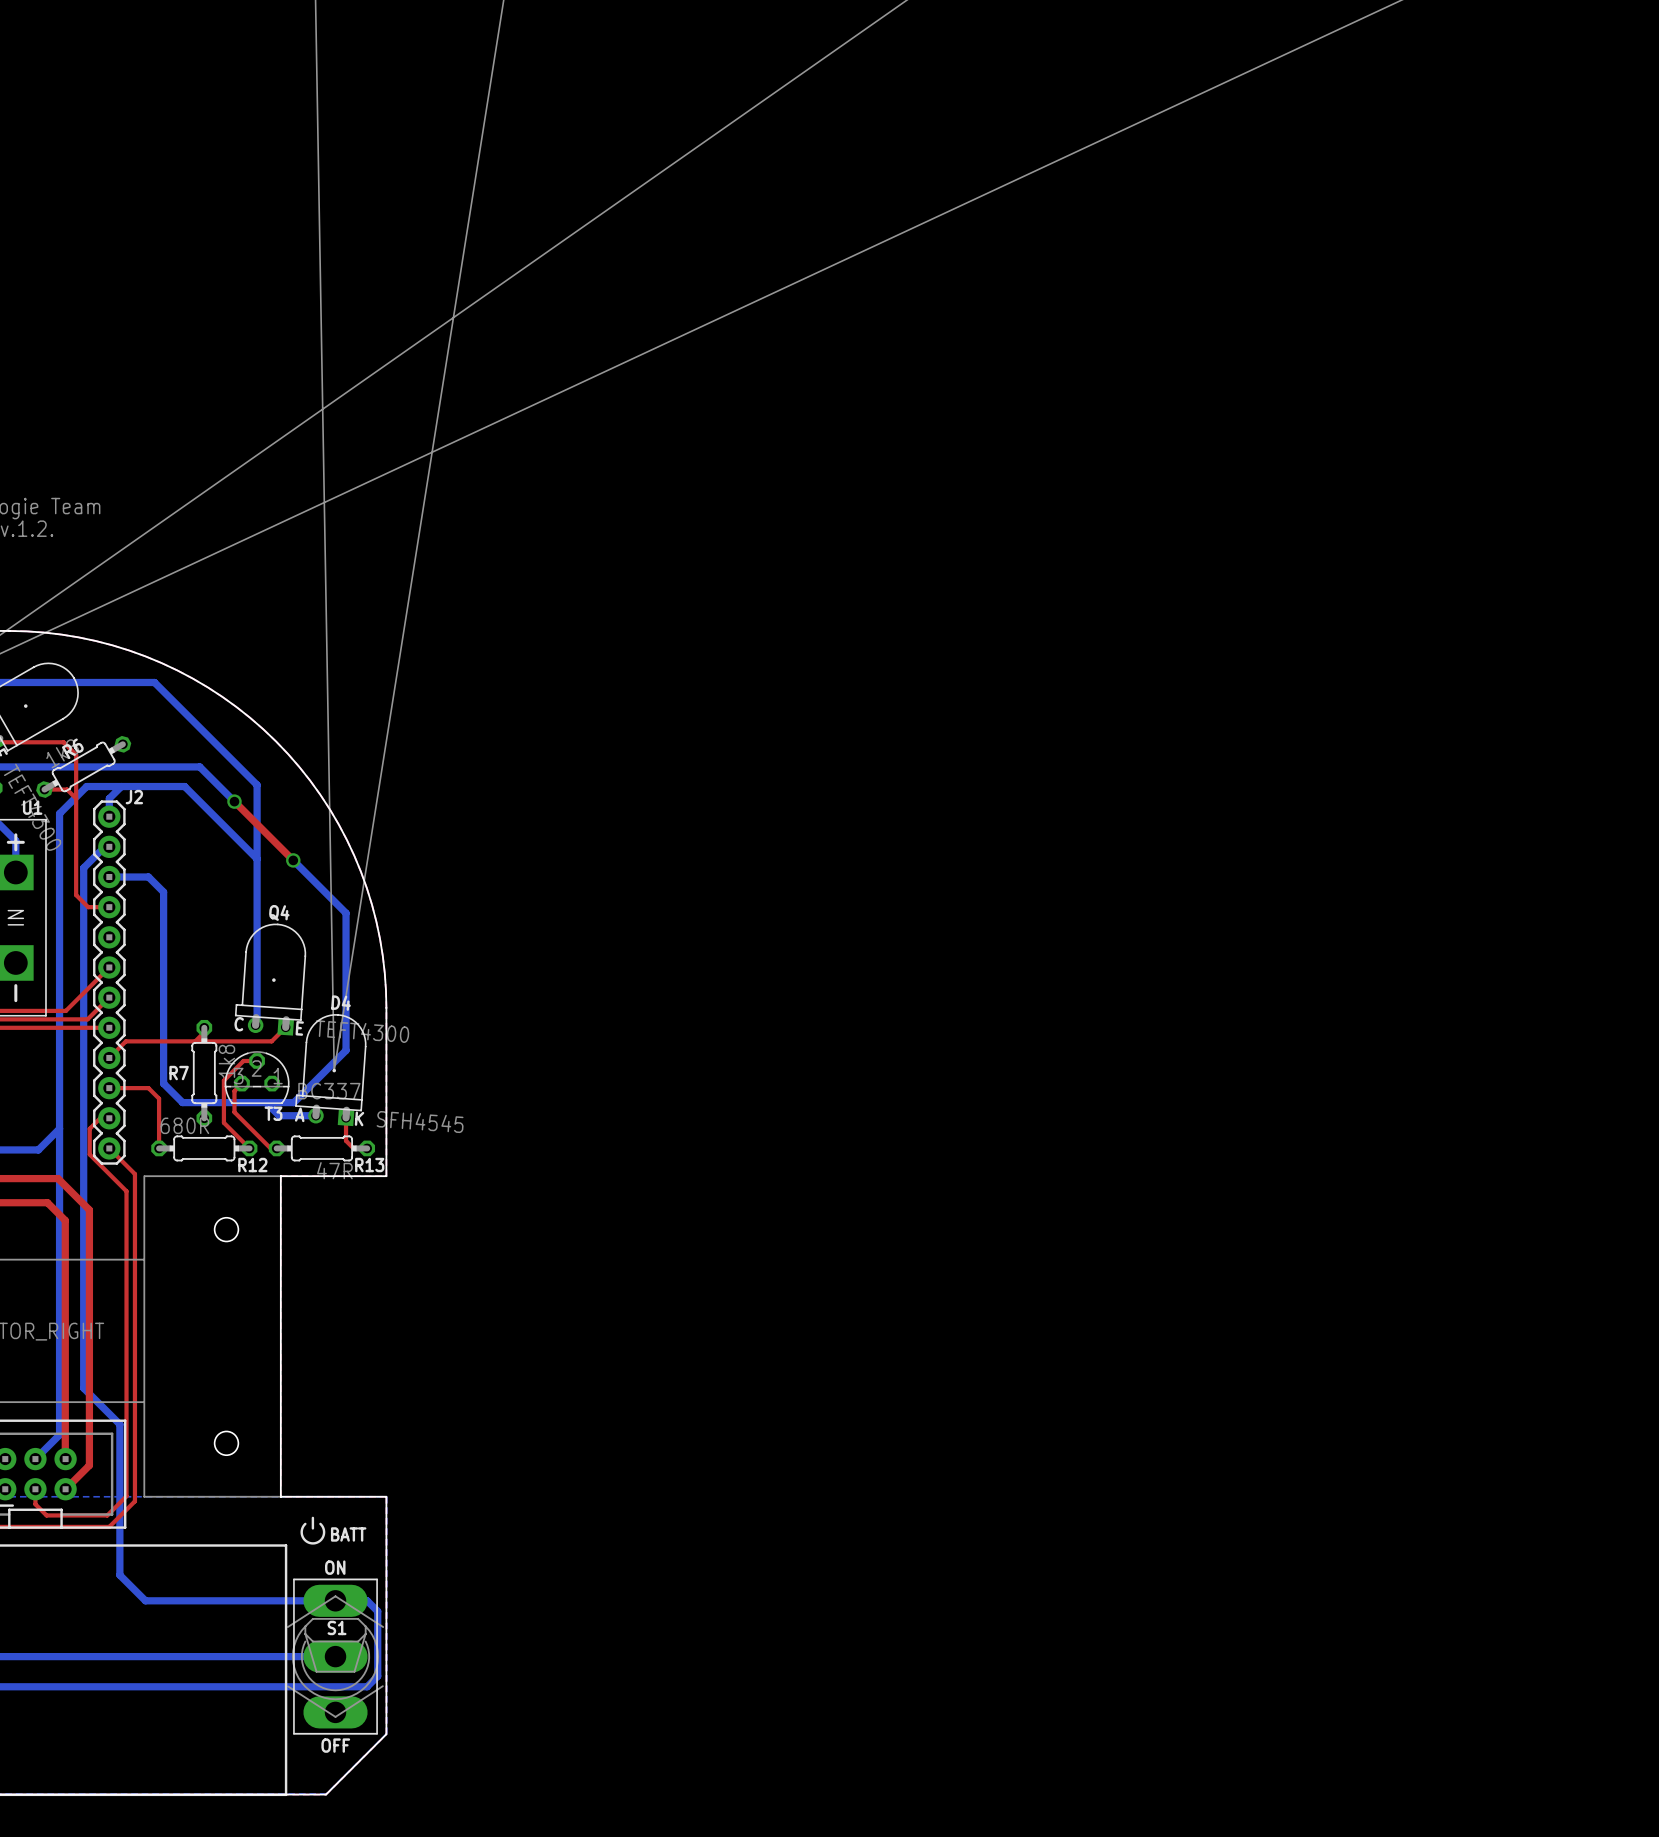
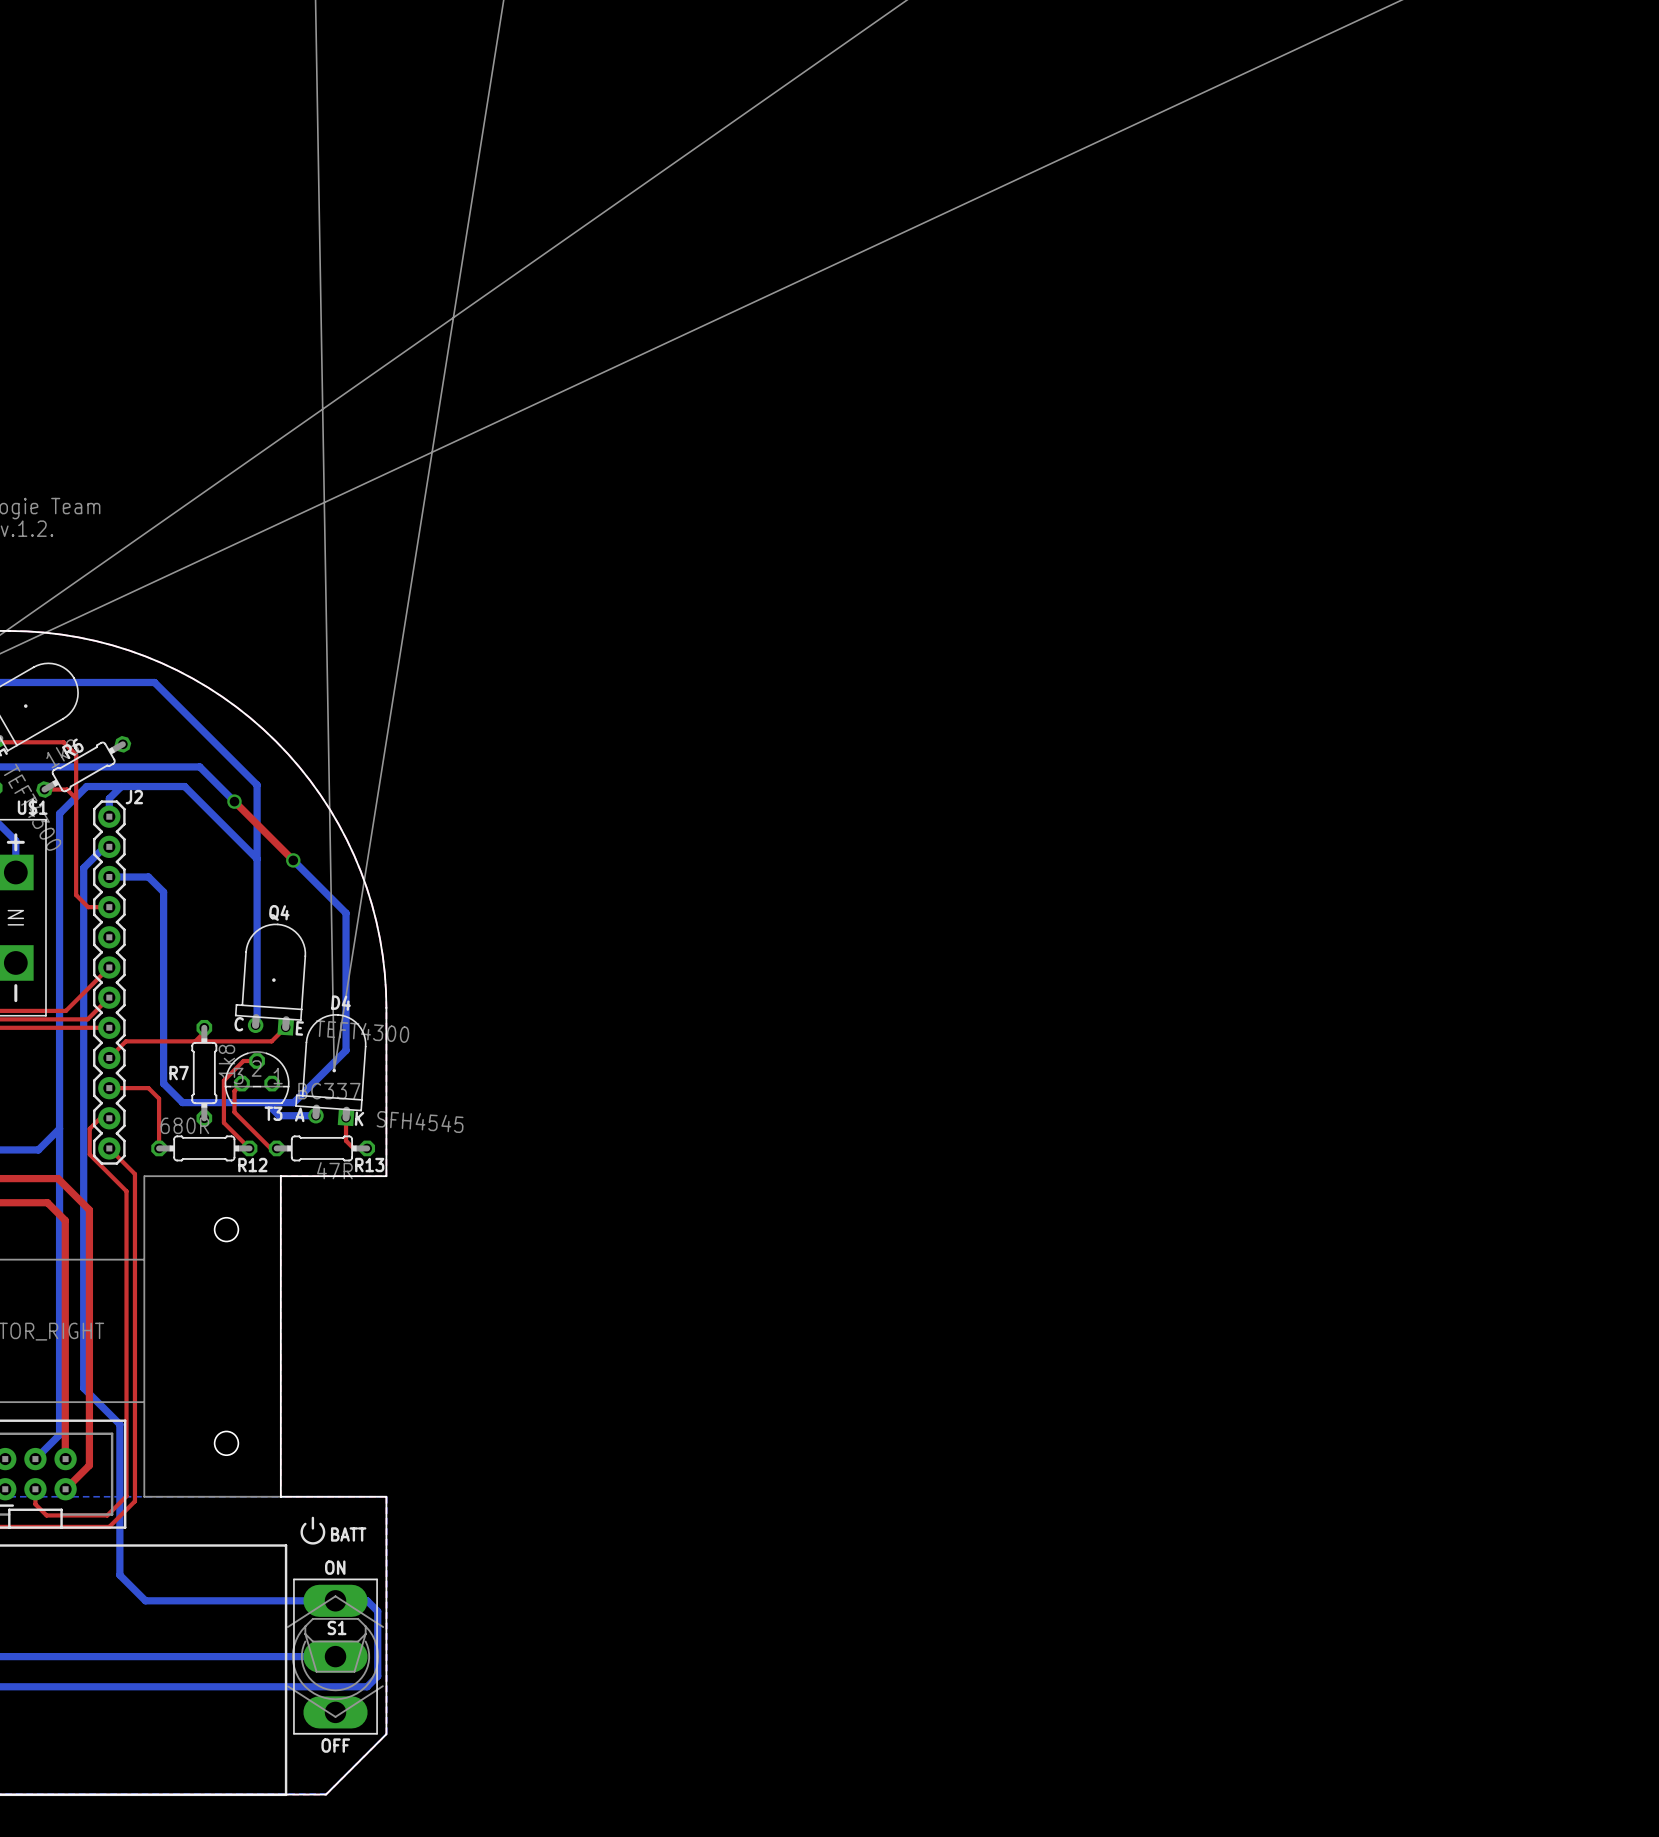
U1 name: U1 (32, 807) -> U$1 (32, 807)

